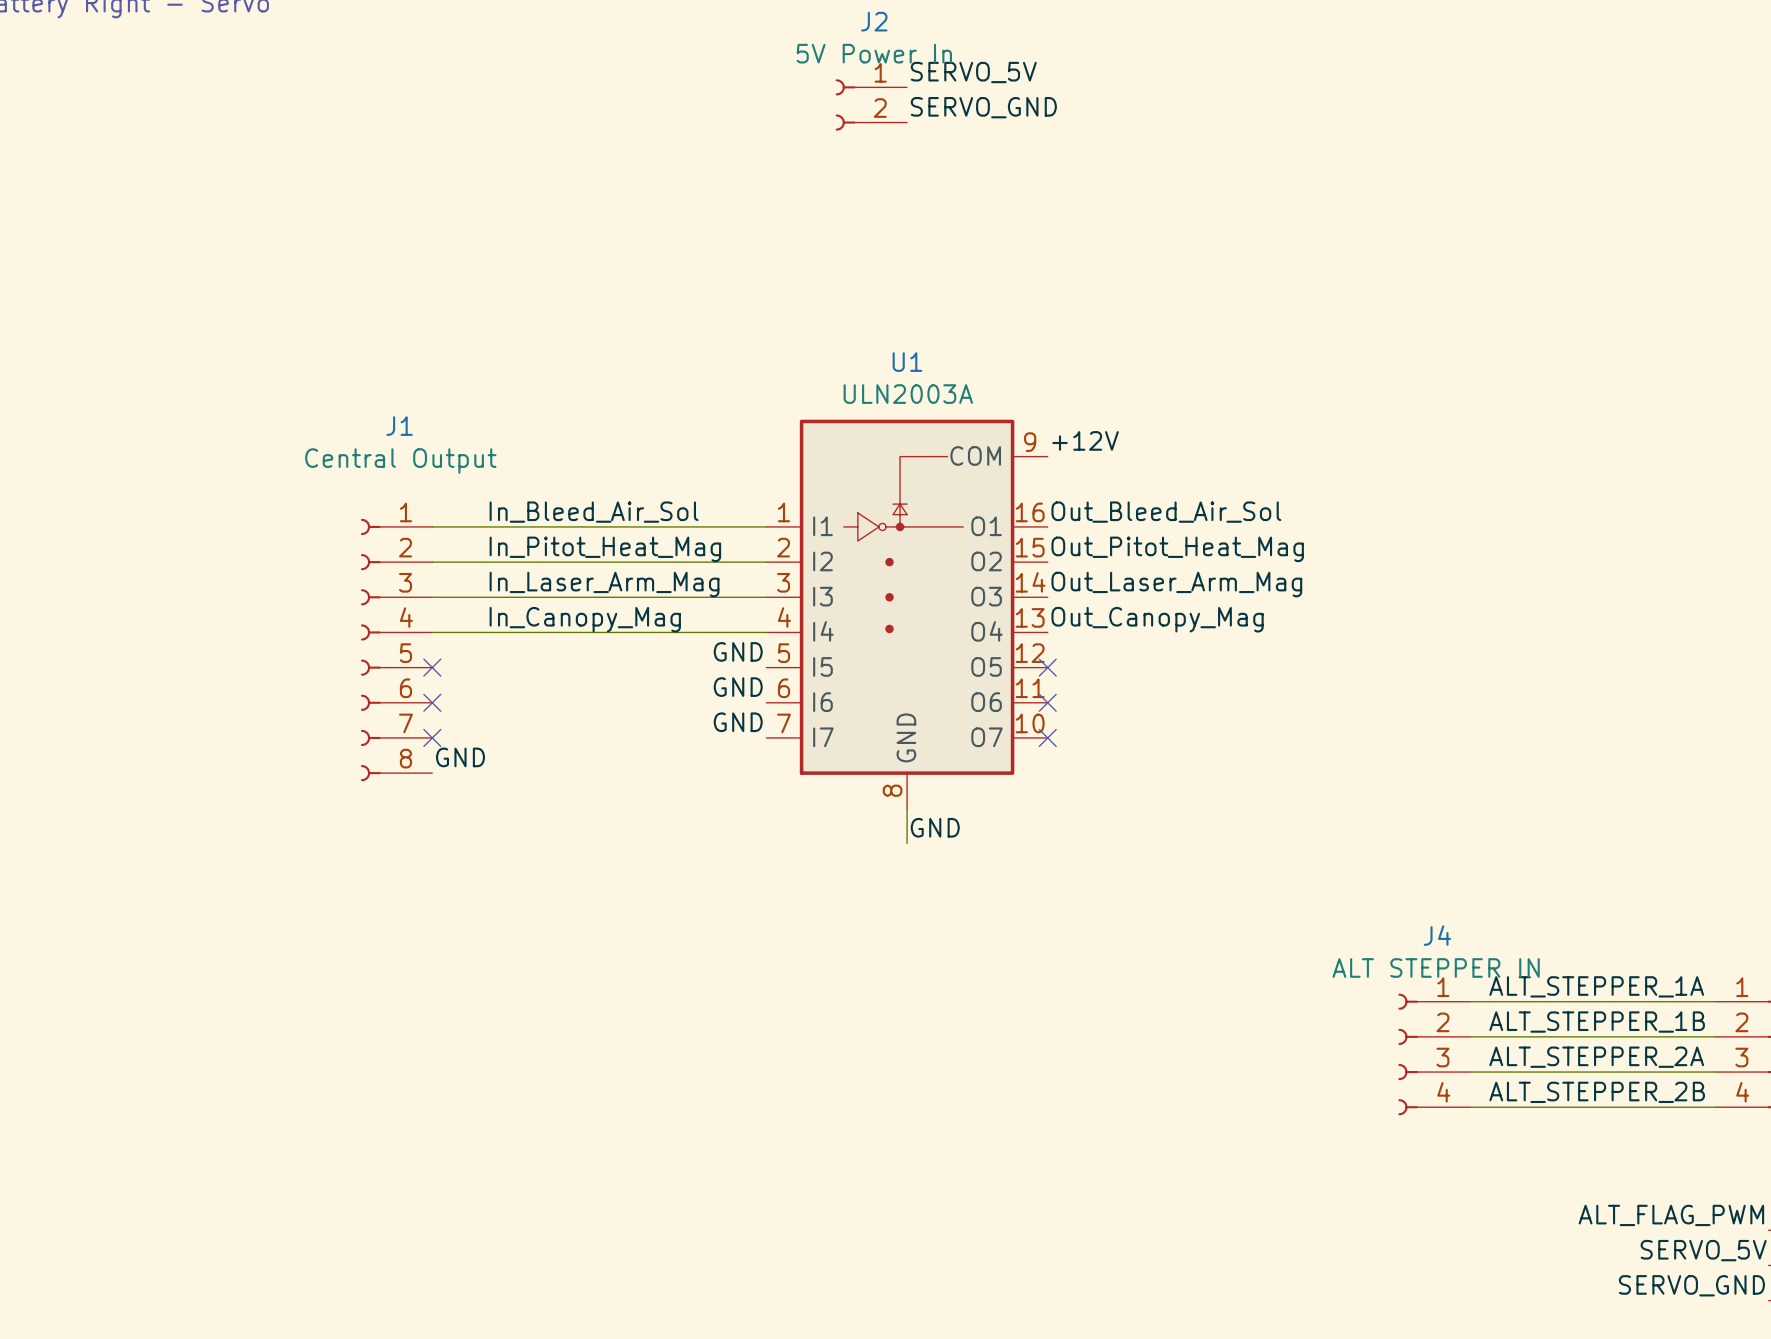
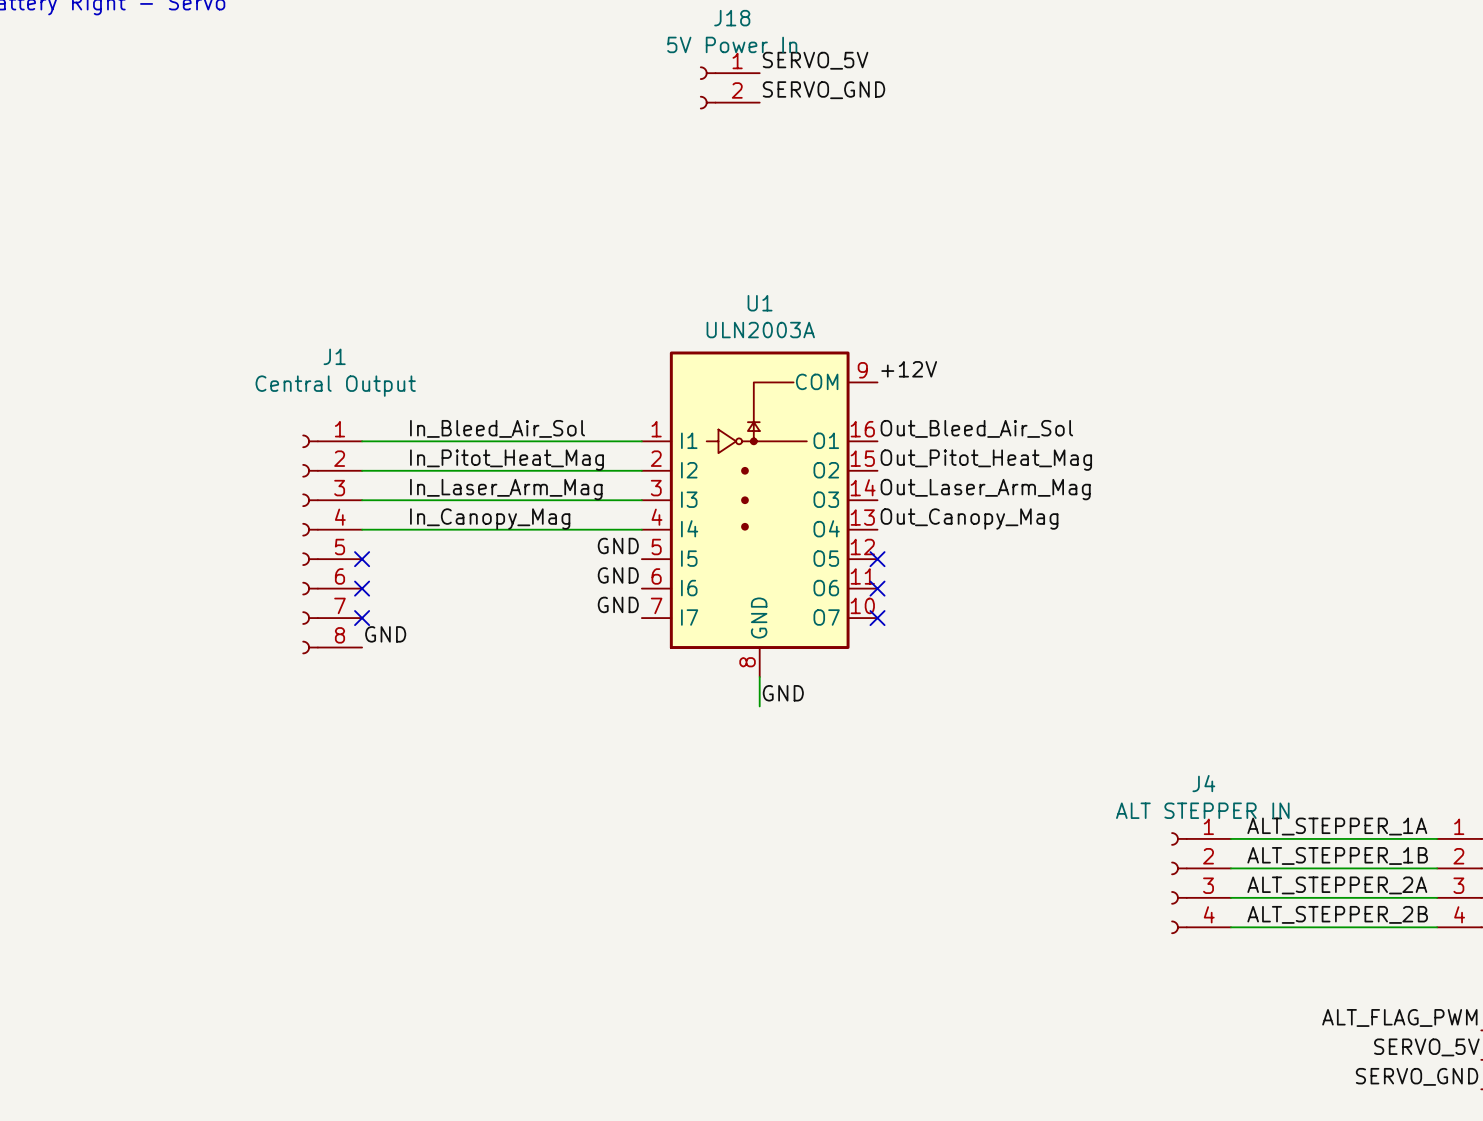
J2 name: J2 (874, 21) -> J18 (732, 18)

